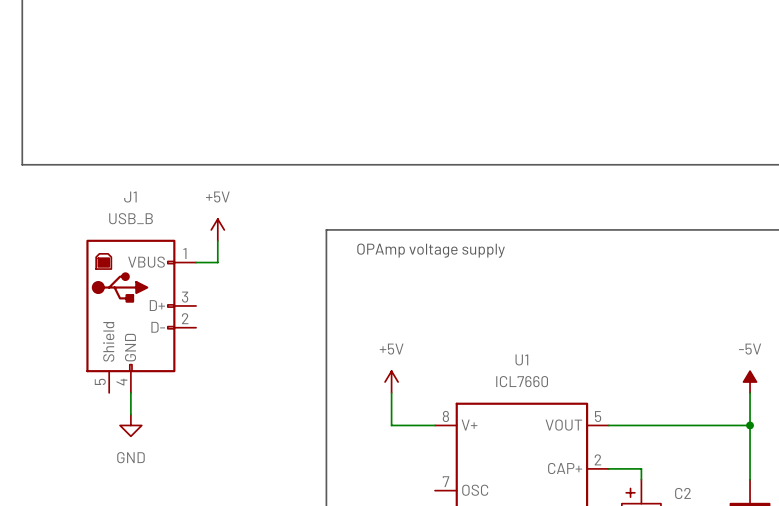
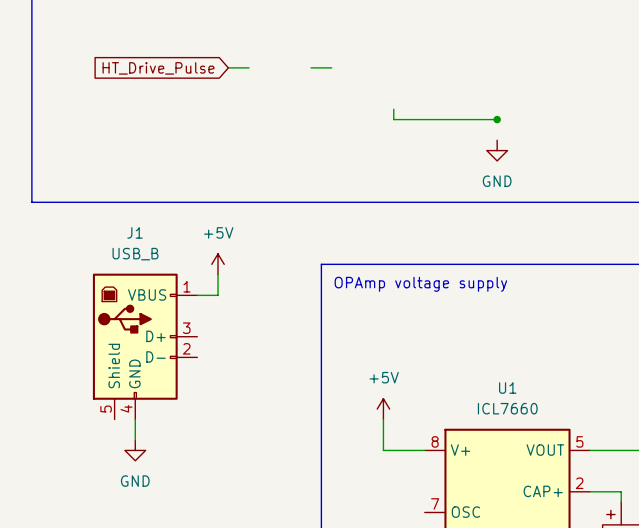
global label: none -> HT_Drive_Pulse (158, 68)
wire: none -> (228, 67) (249, 67)
wire: none -> (311, 67) (331, 67)
wire: none -> (393, 109) (393, 119) (497, 119)
junction: none -> (497, 119)
power symbol: none -> GND (497, 150)

